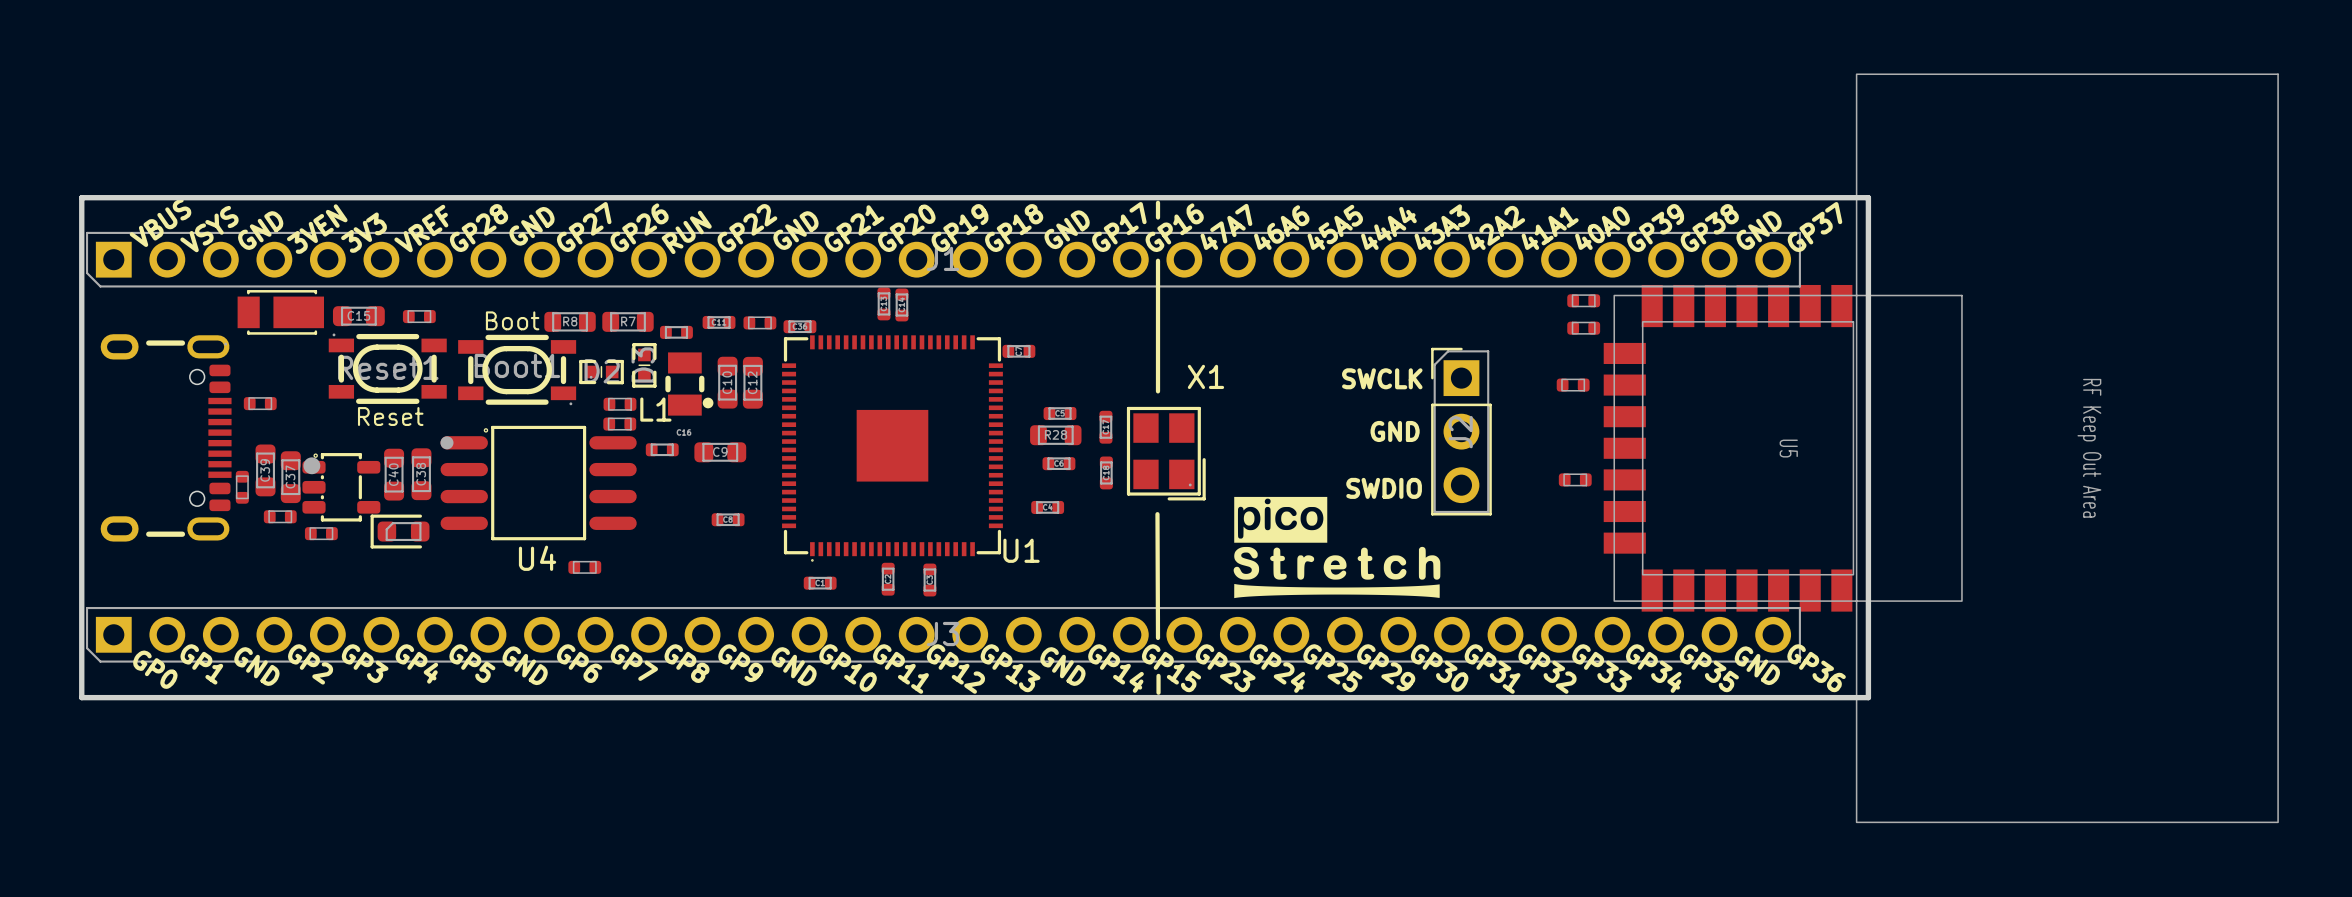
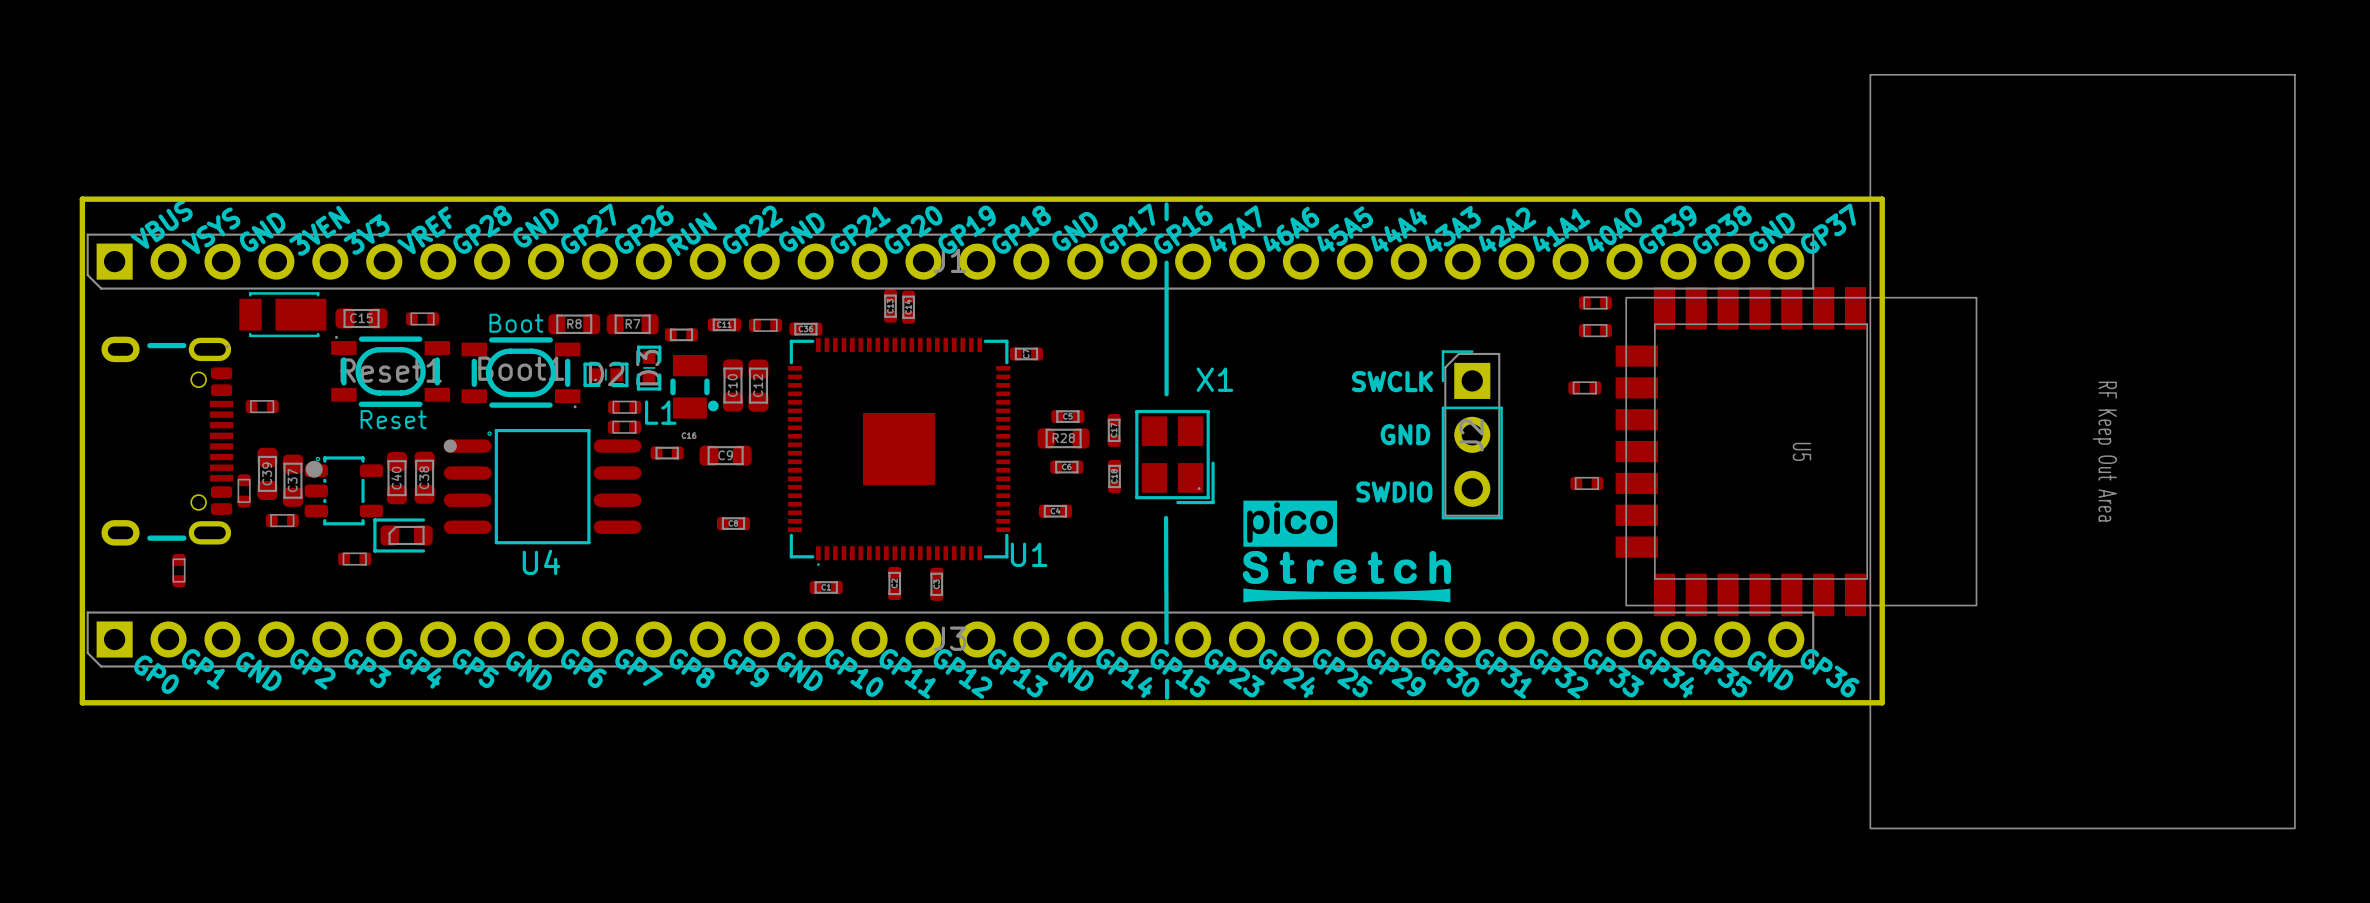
part position: (321, 533) -> (354, 559)
part: none -> (178, 570)
part: (584, 567) -> none

